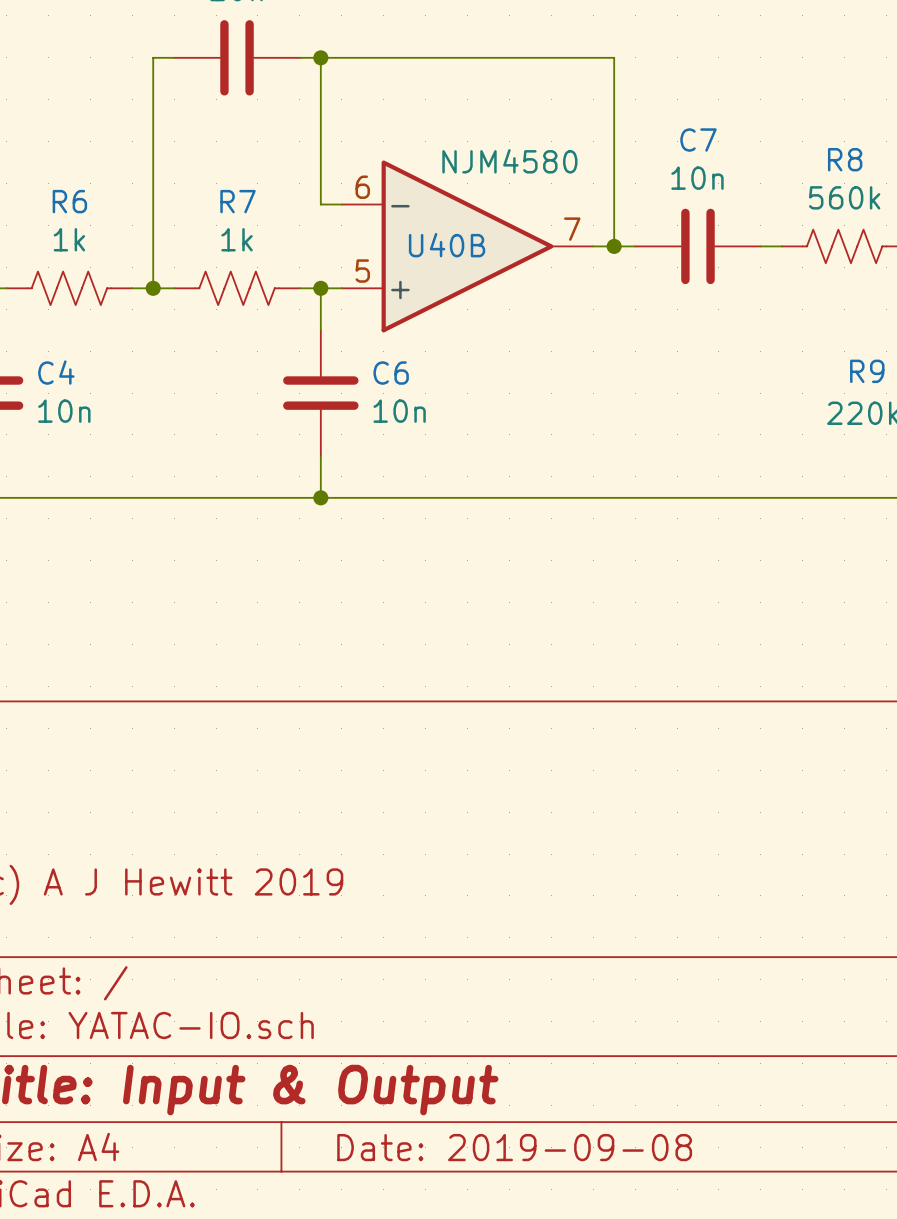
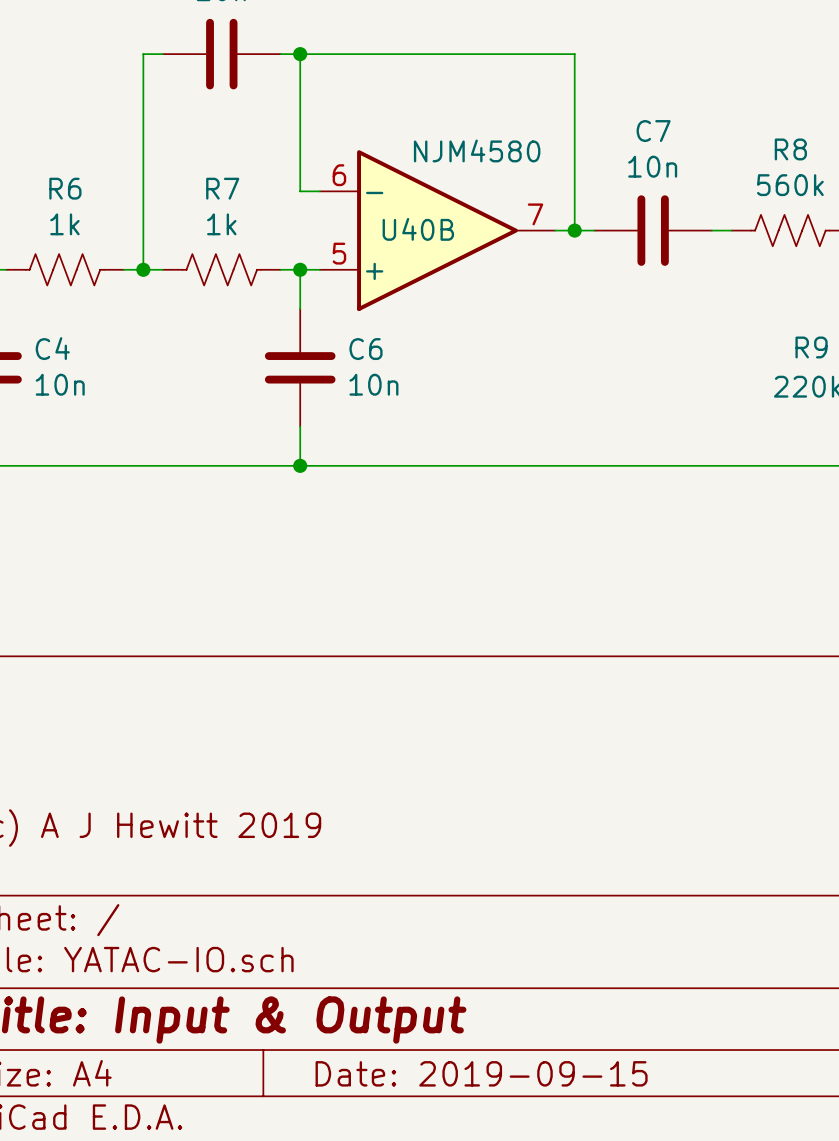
title block: Date: 2019-09-08 (514, 1147) -> Date: 2019-09-15 (481, 1073)

